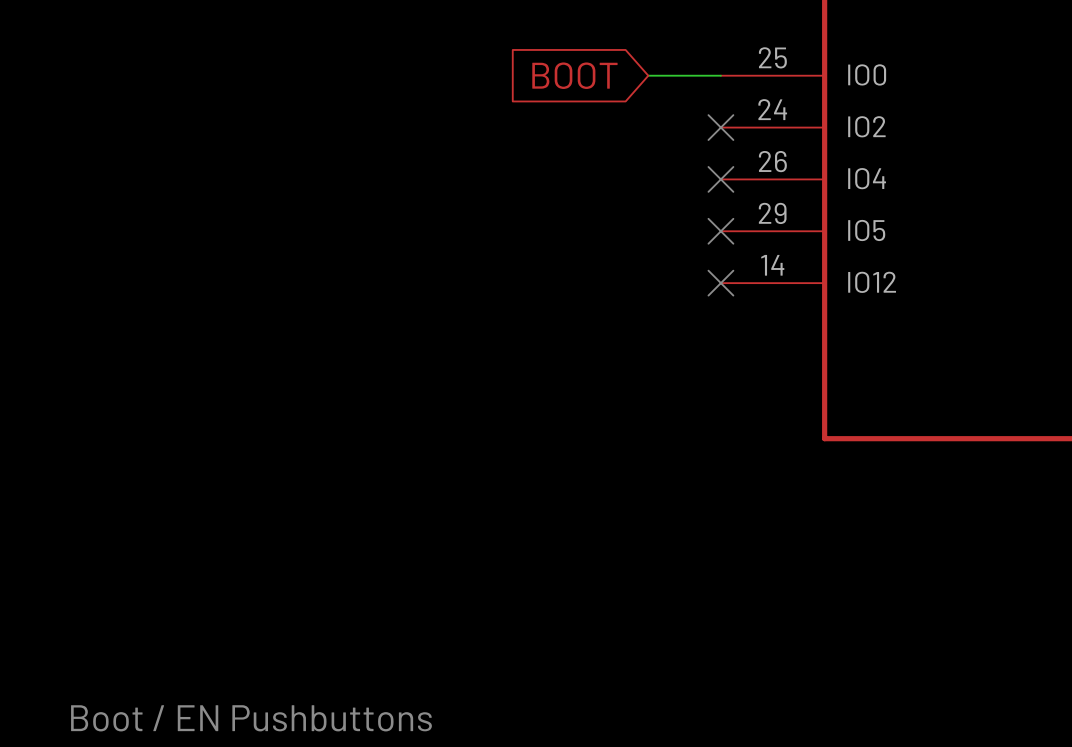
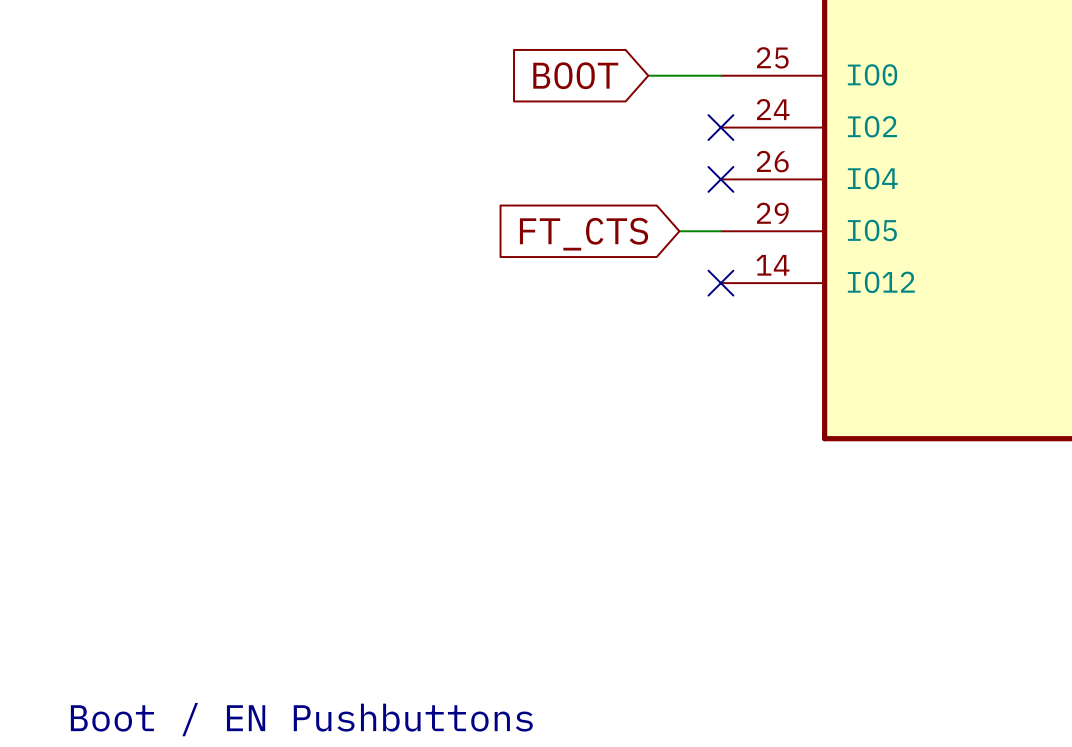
global label: none -> FT_CTS (584, 234)
wire: none -> (679, 231) (720, 231)
no-connect mark: (720, 231) -> none

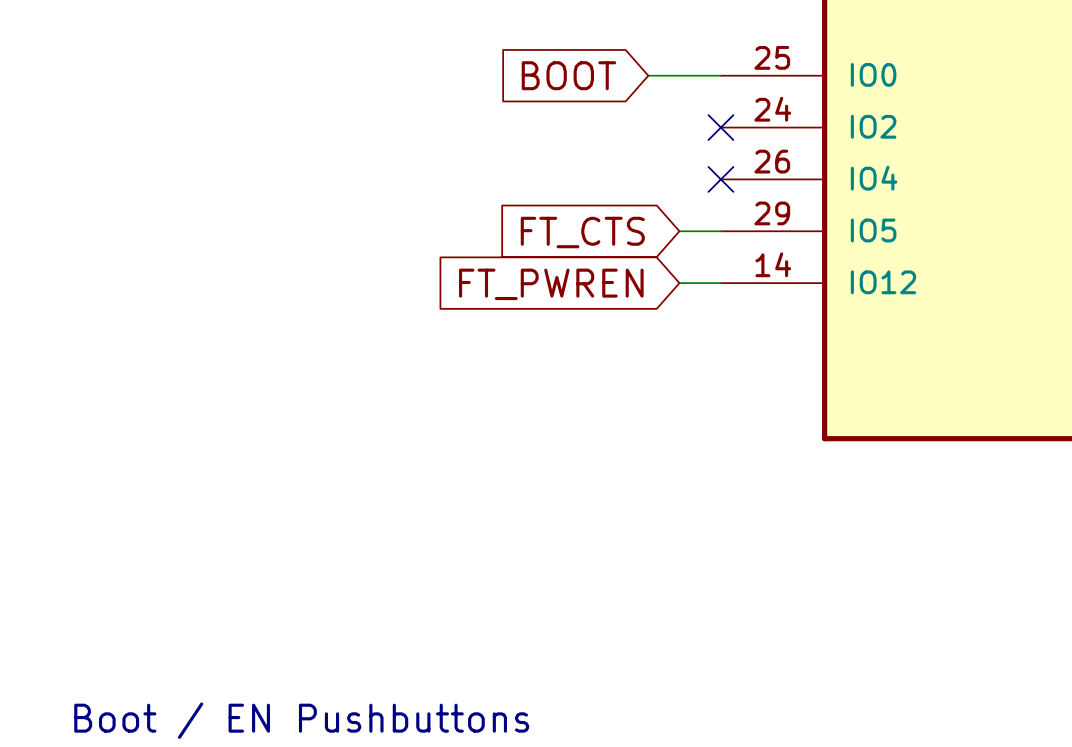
wire: none -> (679, 283) (720, 283)
no-connect mark: (720, 283) -> none
global label: none -> FT_PWREN (551, 284)

